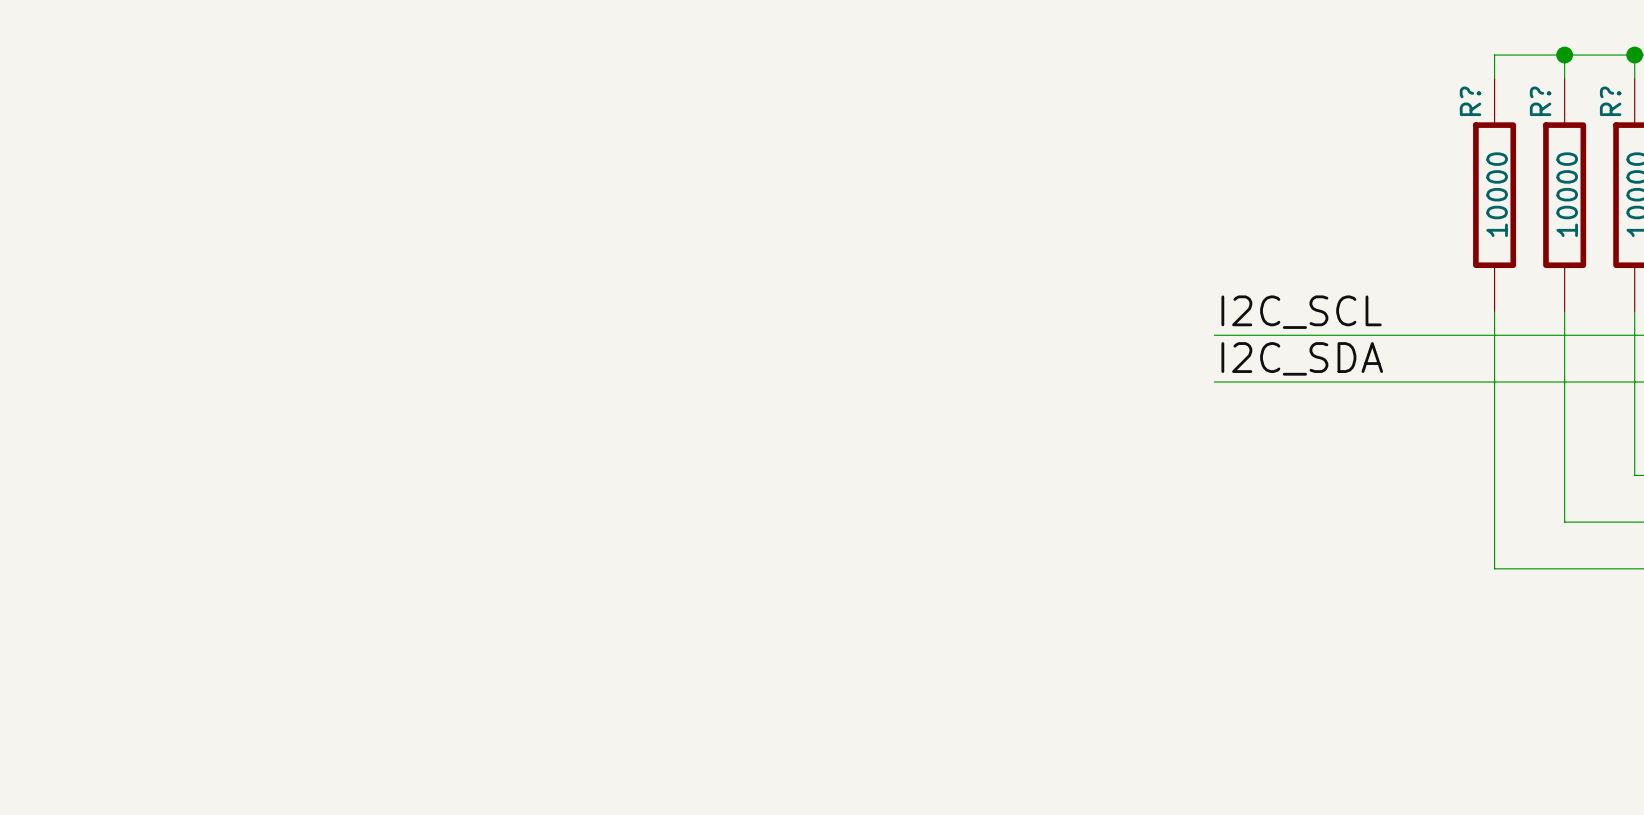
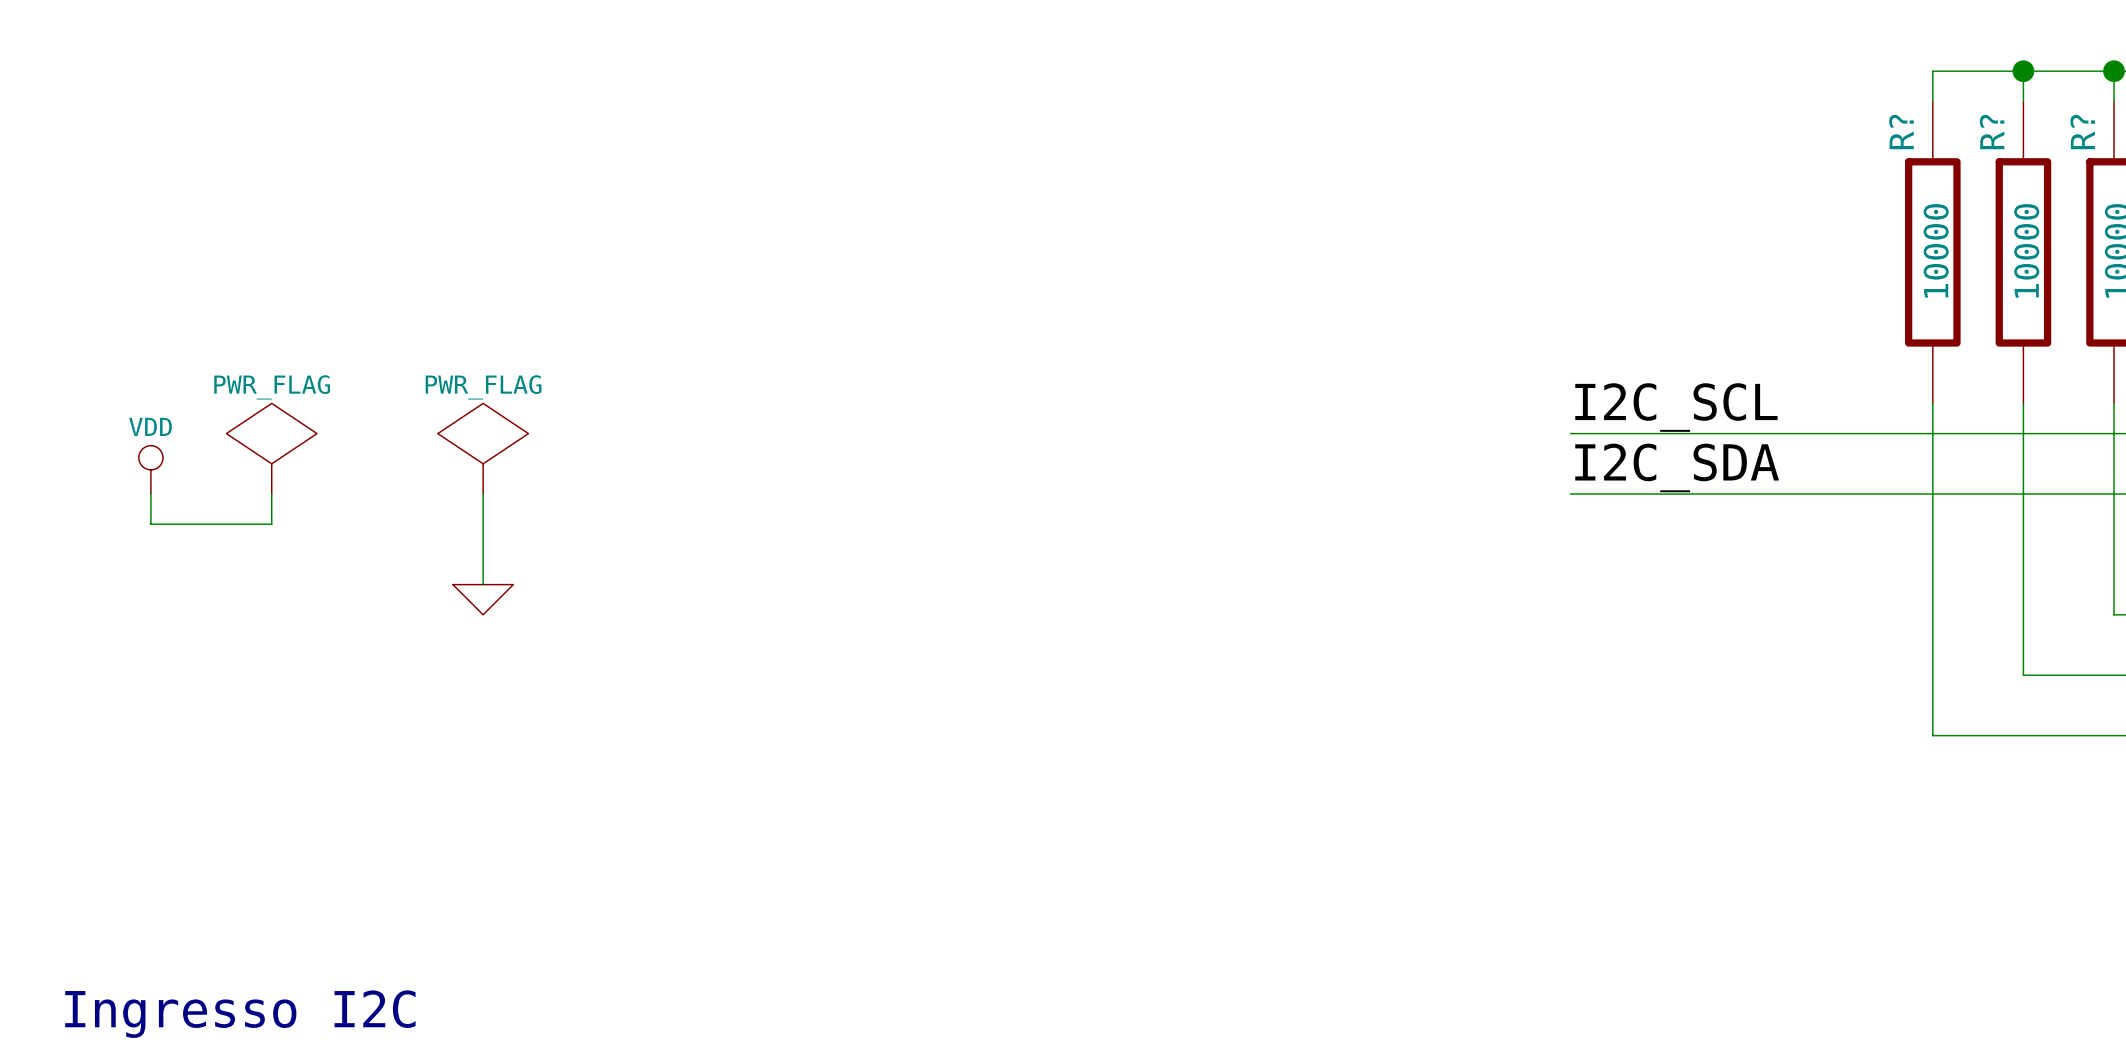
power symbol: none -> PWR_FLAG (271, 448)
power symbol: none -> PWR_FLAG (483, 448)
power symbol: none -> VDD (150, 469)
wire: none -> (150, 494) (150, 524) (271, 524) (271, 494)
wire: none -> (483, 494) (483, 584)
power symbol: none -> (483, 599)
text: none -> Ingresso I2C (240, 1014)

